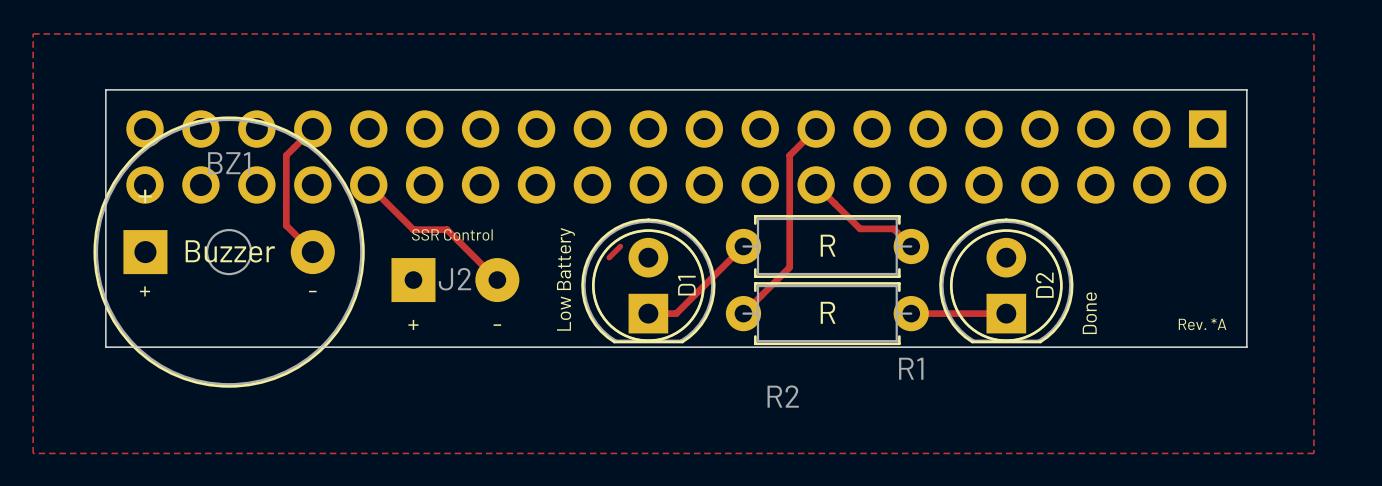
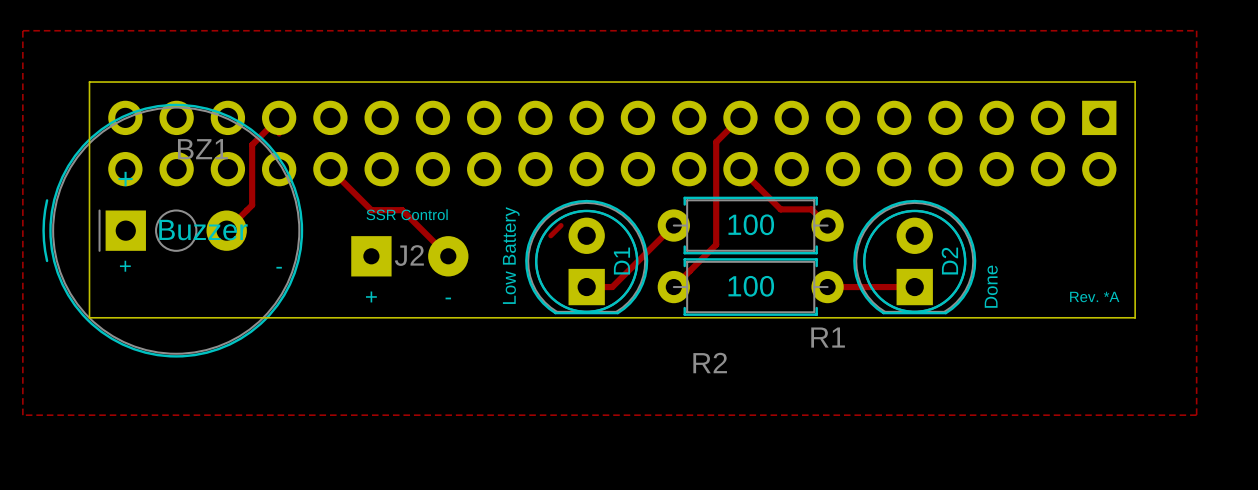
BZ1 footprint: [93, 116, 365, 388] -> [42, 103, 304, 358]
track: (286, 155) (286, 225) (312, 252) -> (254, 142) (252, 144) (252, 205) (226, 230)
R1 value: R (828, 245) -> 100 (751, 224)
R2 value: R (828, 312) -> 100 (751, 286)

